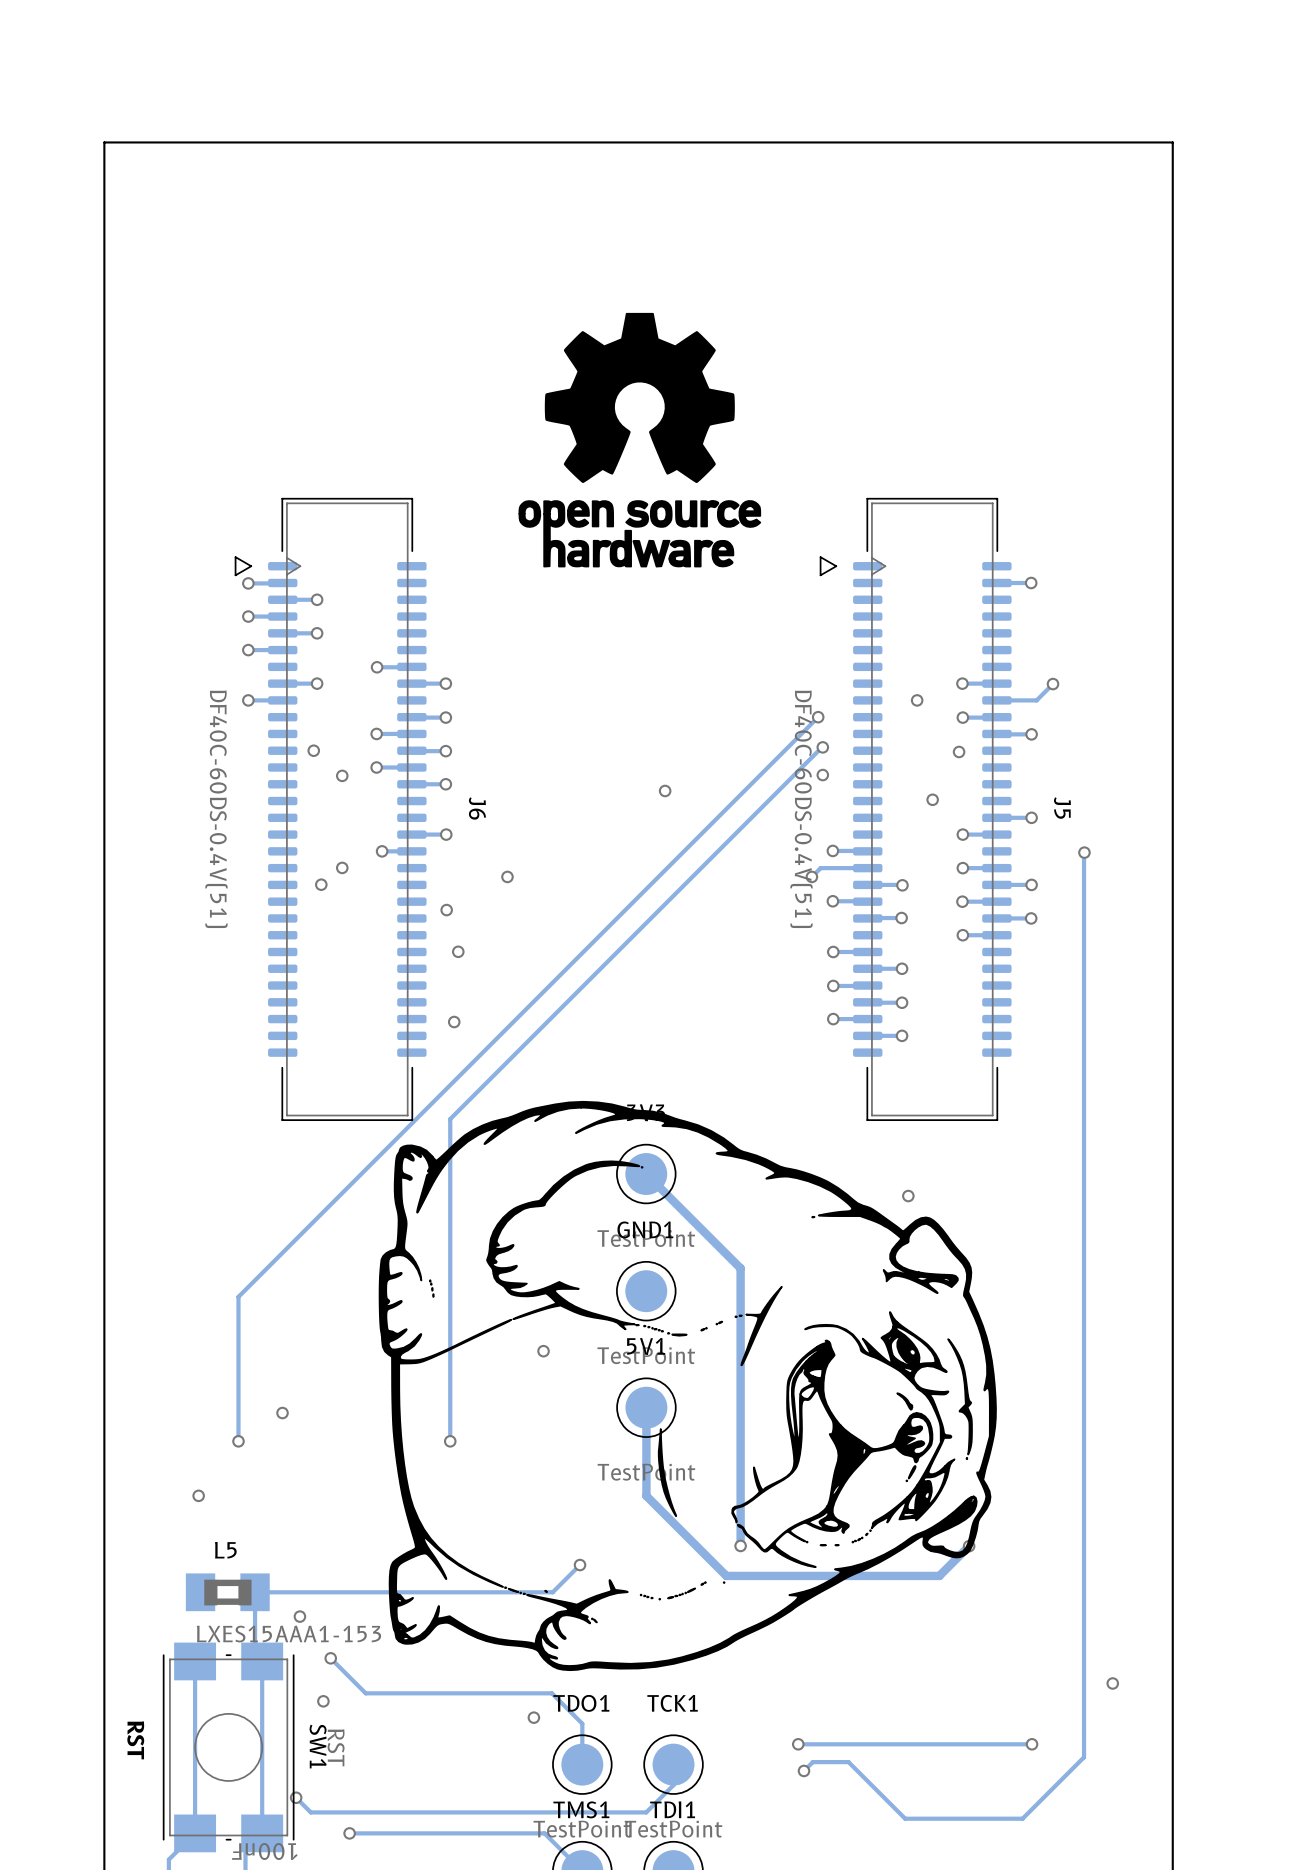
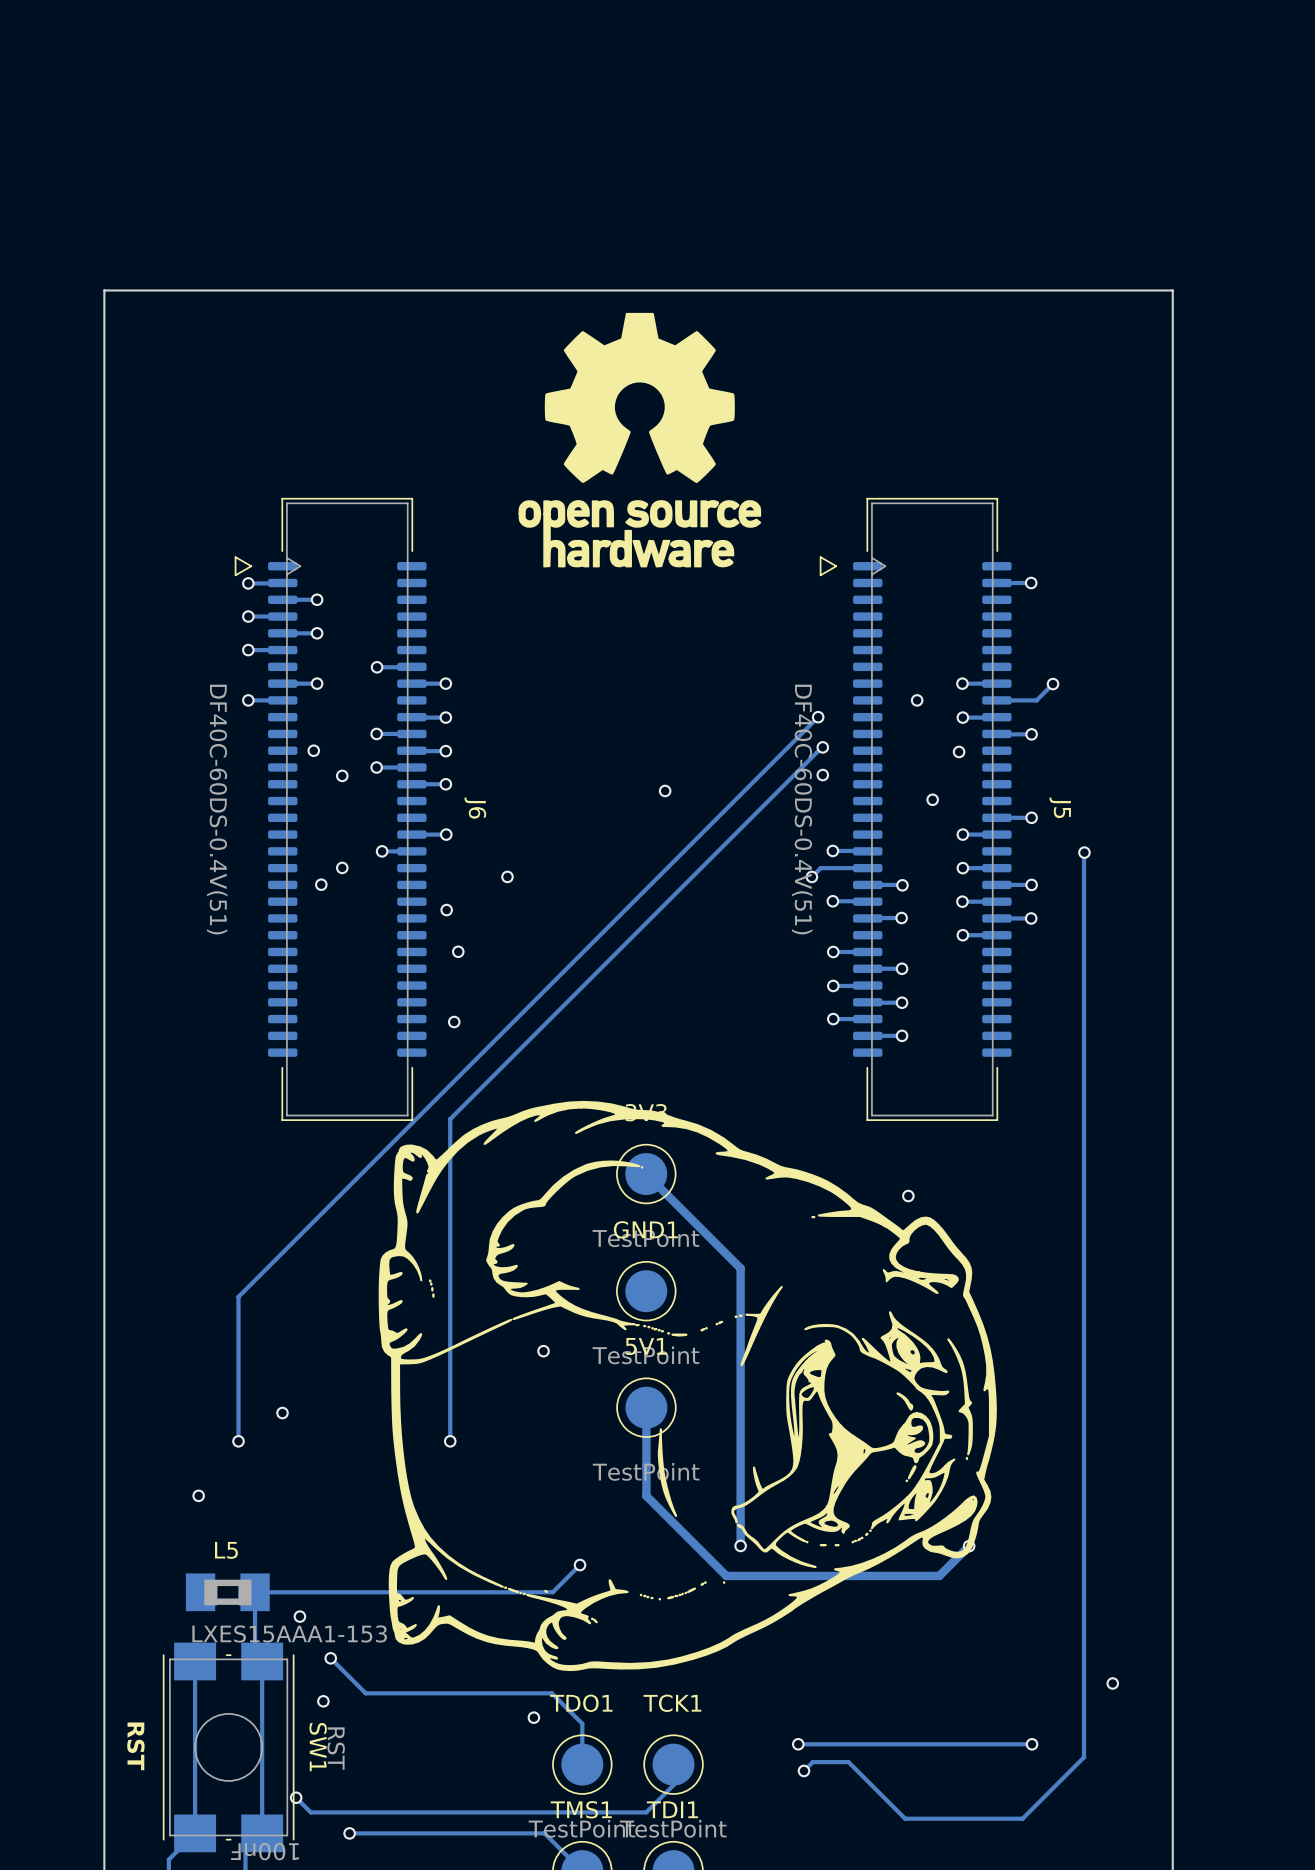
board edge: (1172, 290) (1172, 142) (104, 142) (104, 290) -> (1172, 290) (104, 290)

